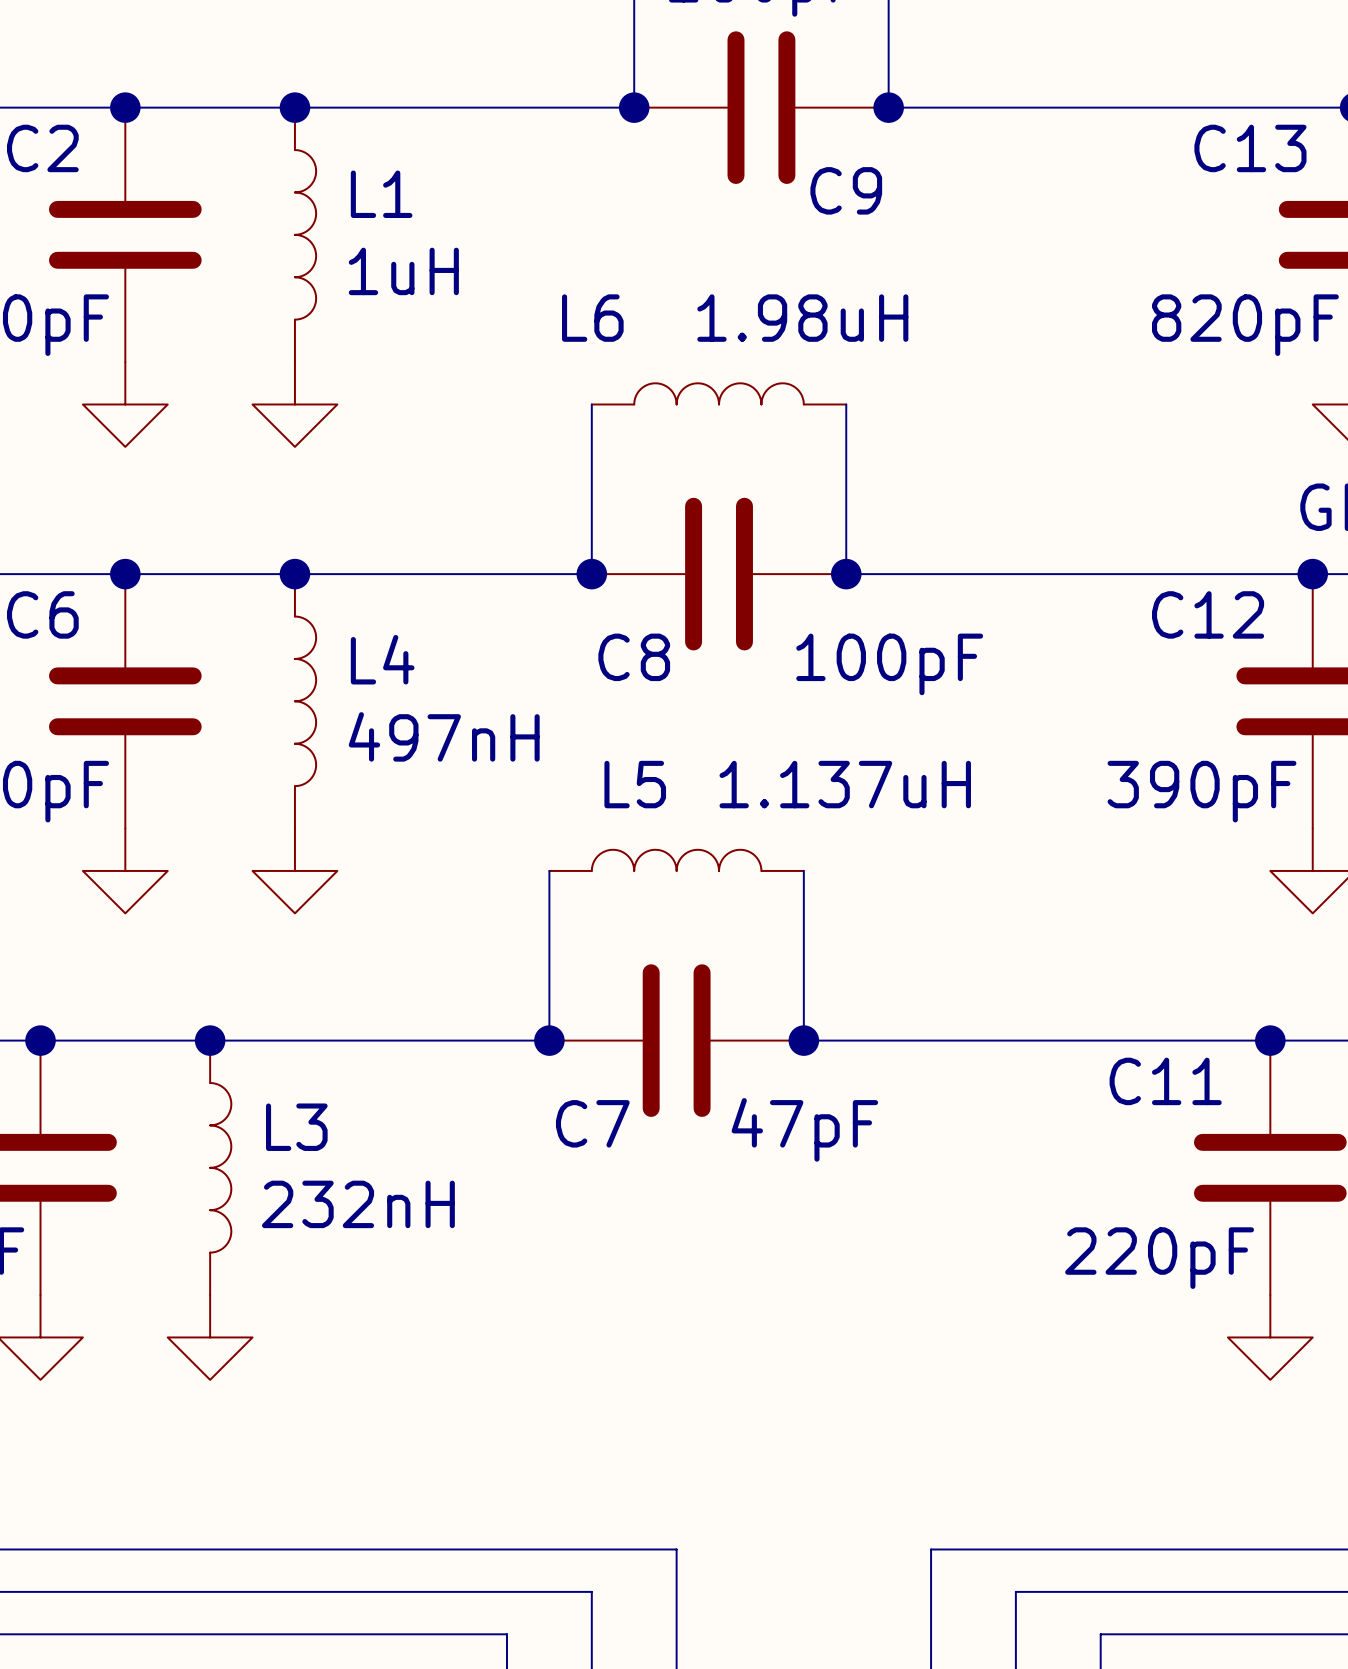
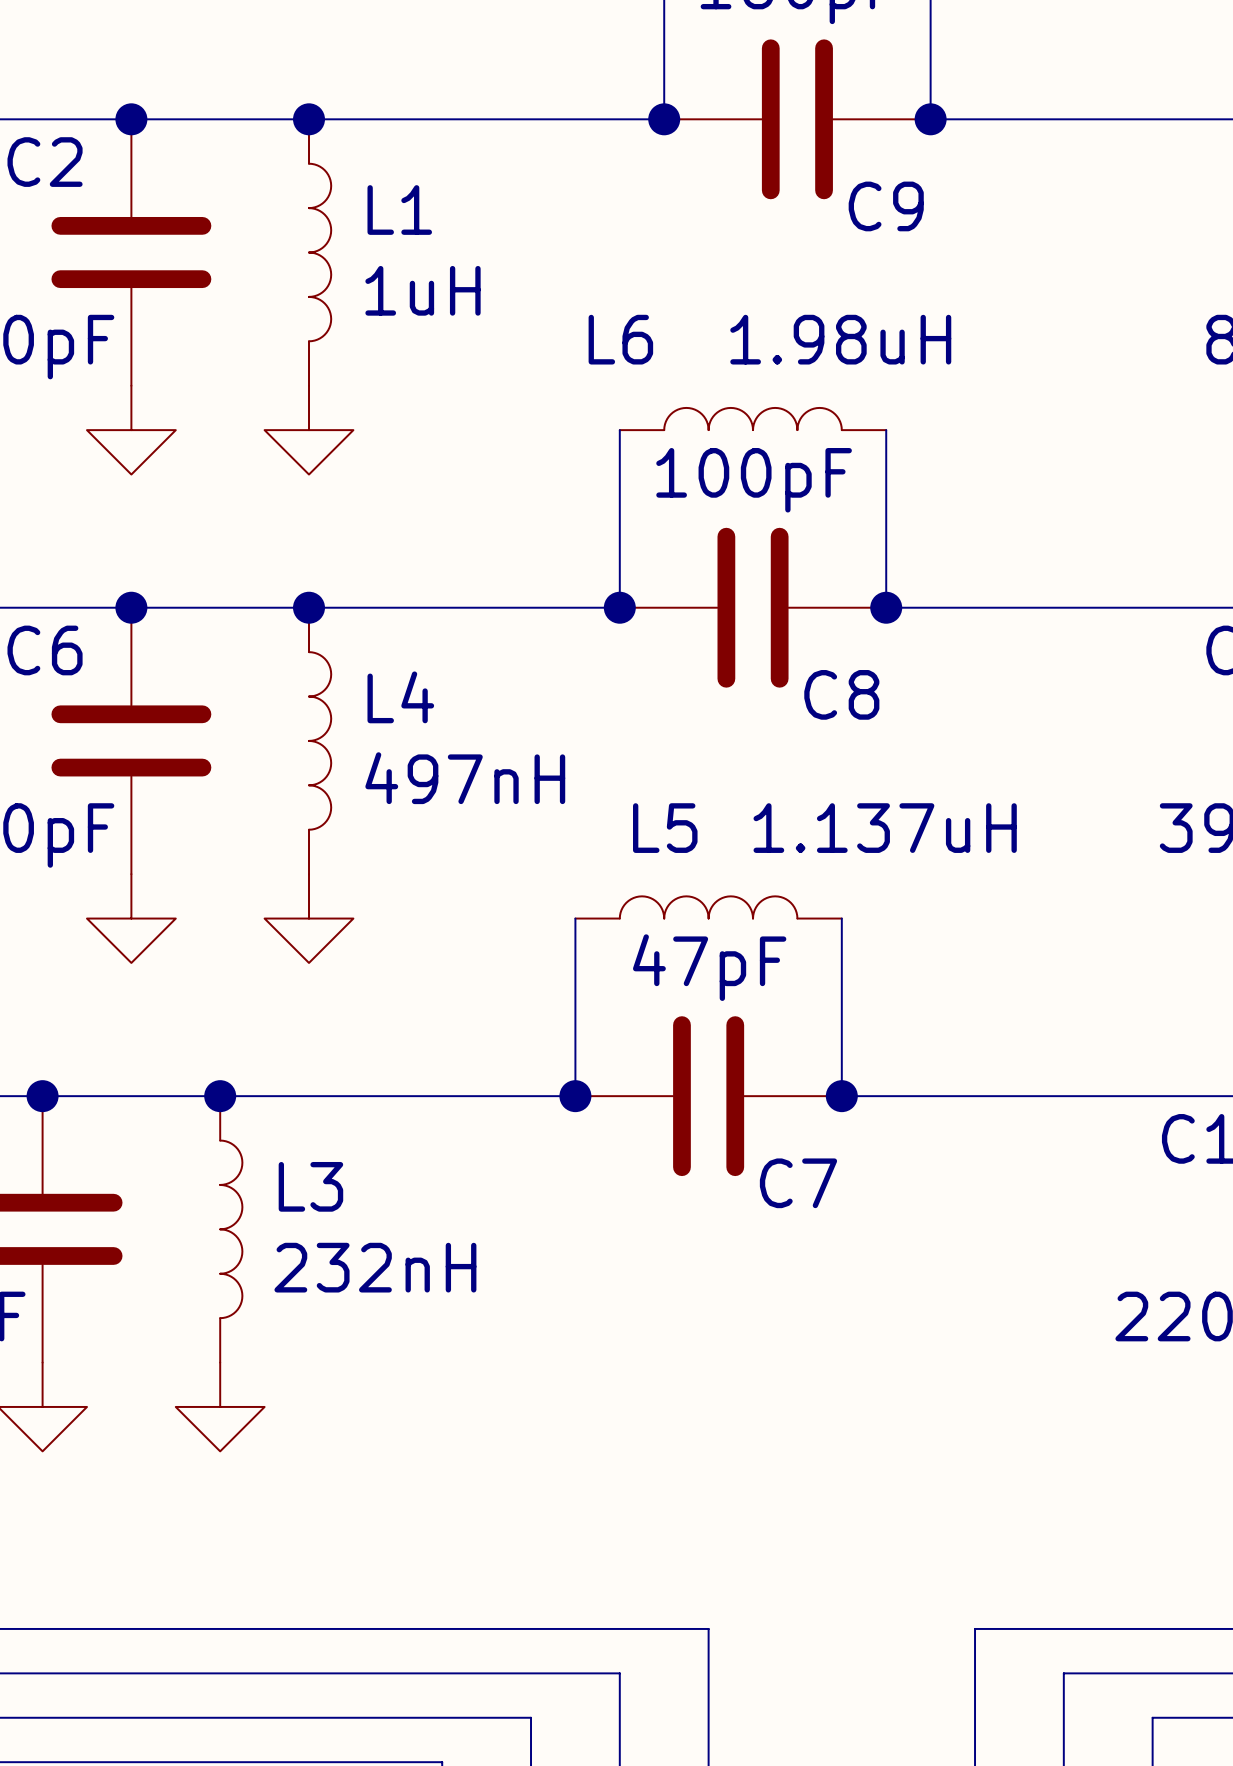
C8 name position: C8 (634, 657) -> C8 (841, 694)
C8 value position: 100pF (889, 664) -> 100pF (754, 480)
C7 name position: C7 (592, 1123) -> C7 (798, 1183)
C7 value position: 47pF (804, 1129) -> 47pF (709, 967)

